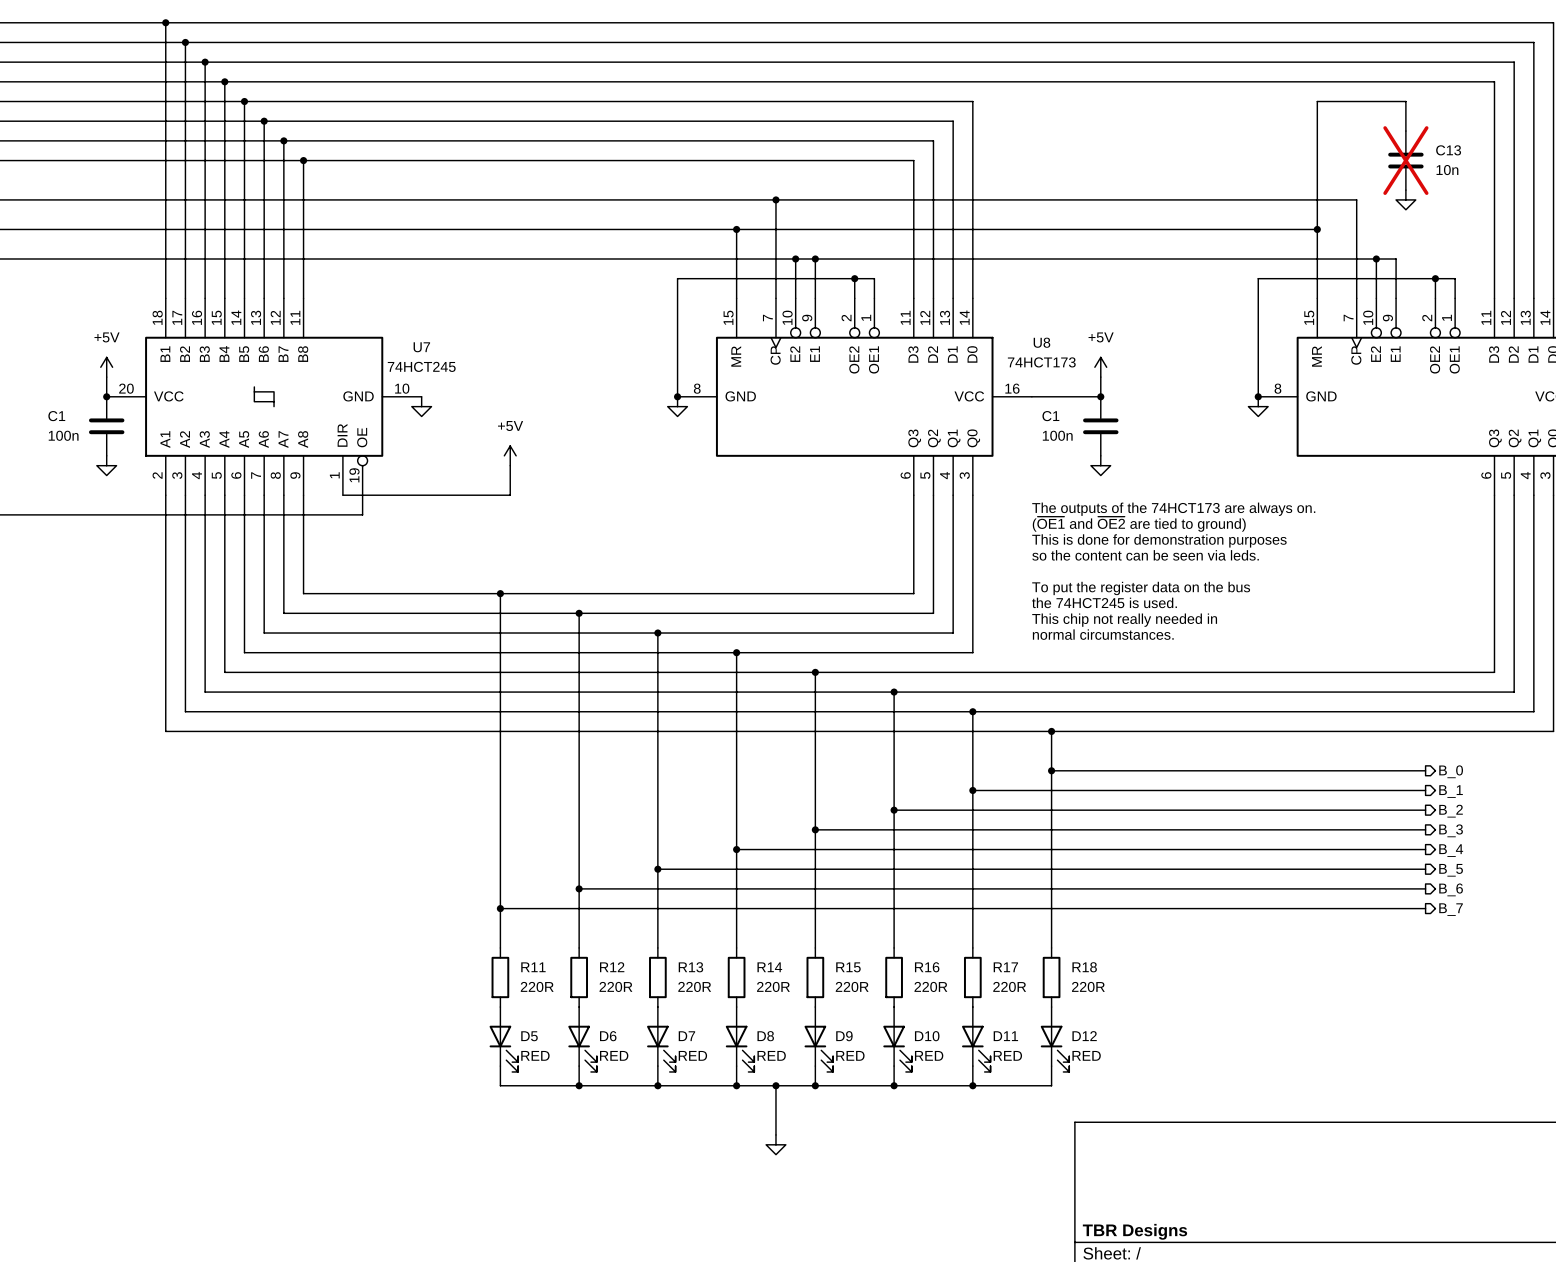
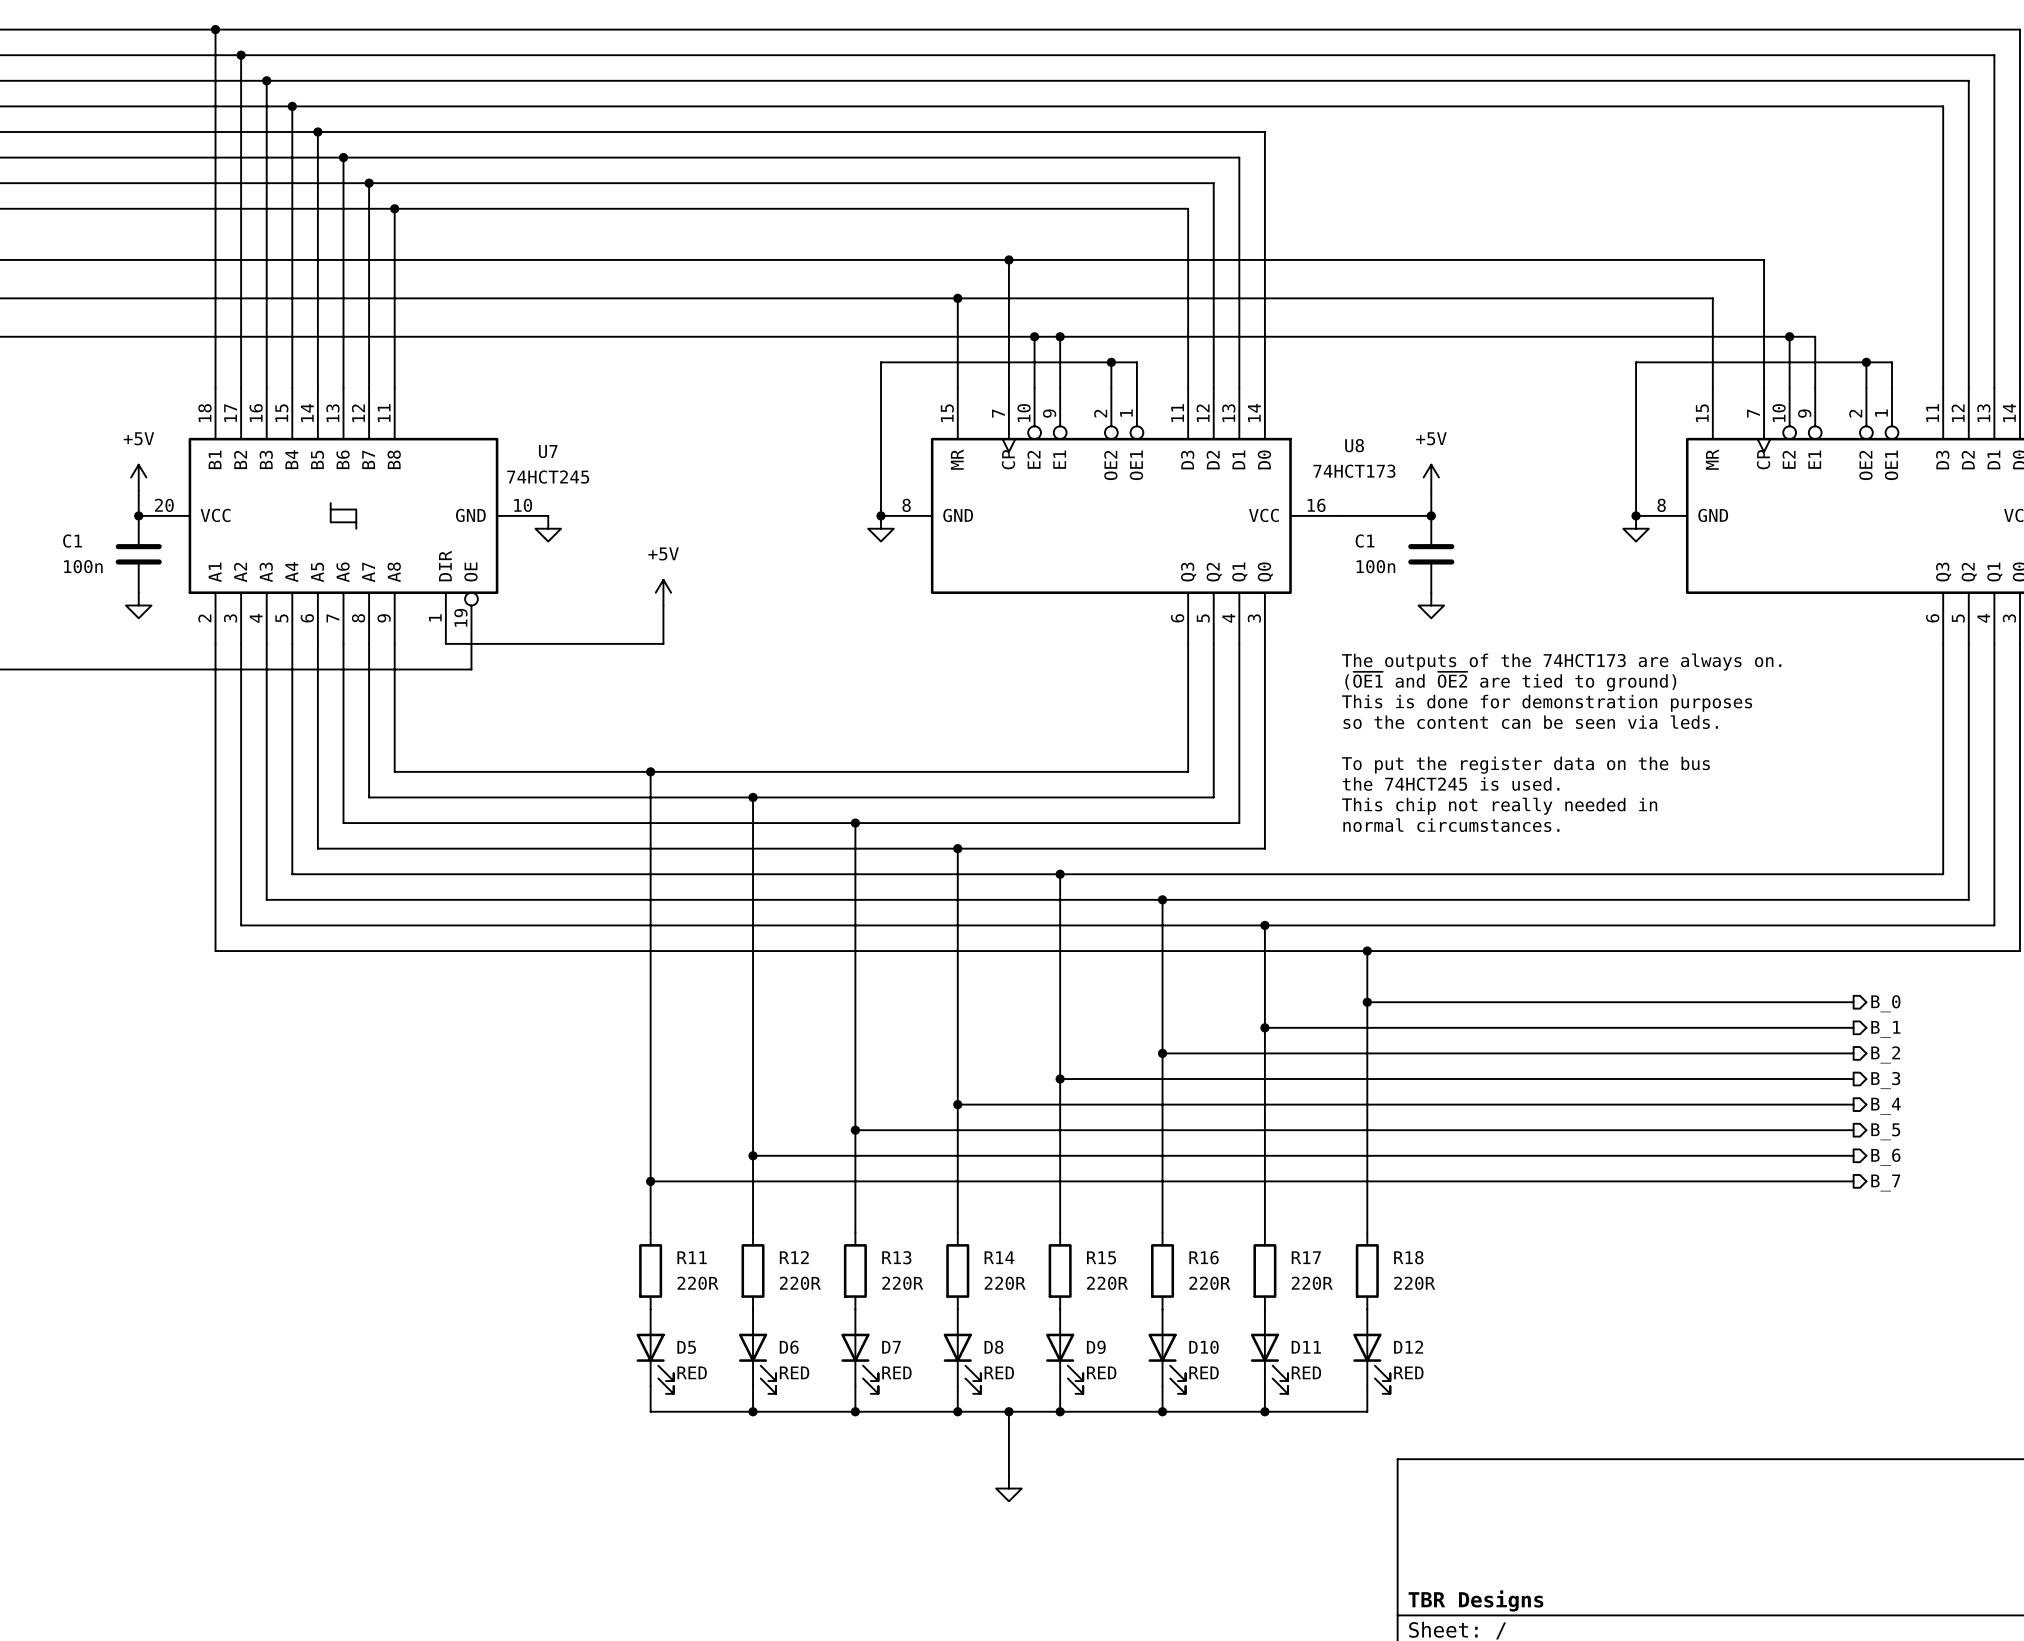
wire: (1405, 131) (1405, 101) (1317, 101) (1317, 229) -> none
C13: 10n (1405, 160) -> none
power symbol: (1405, 199) -> none
junction: (1317, 229) -> none

